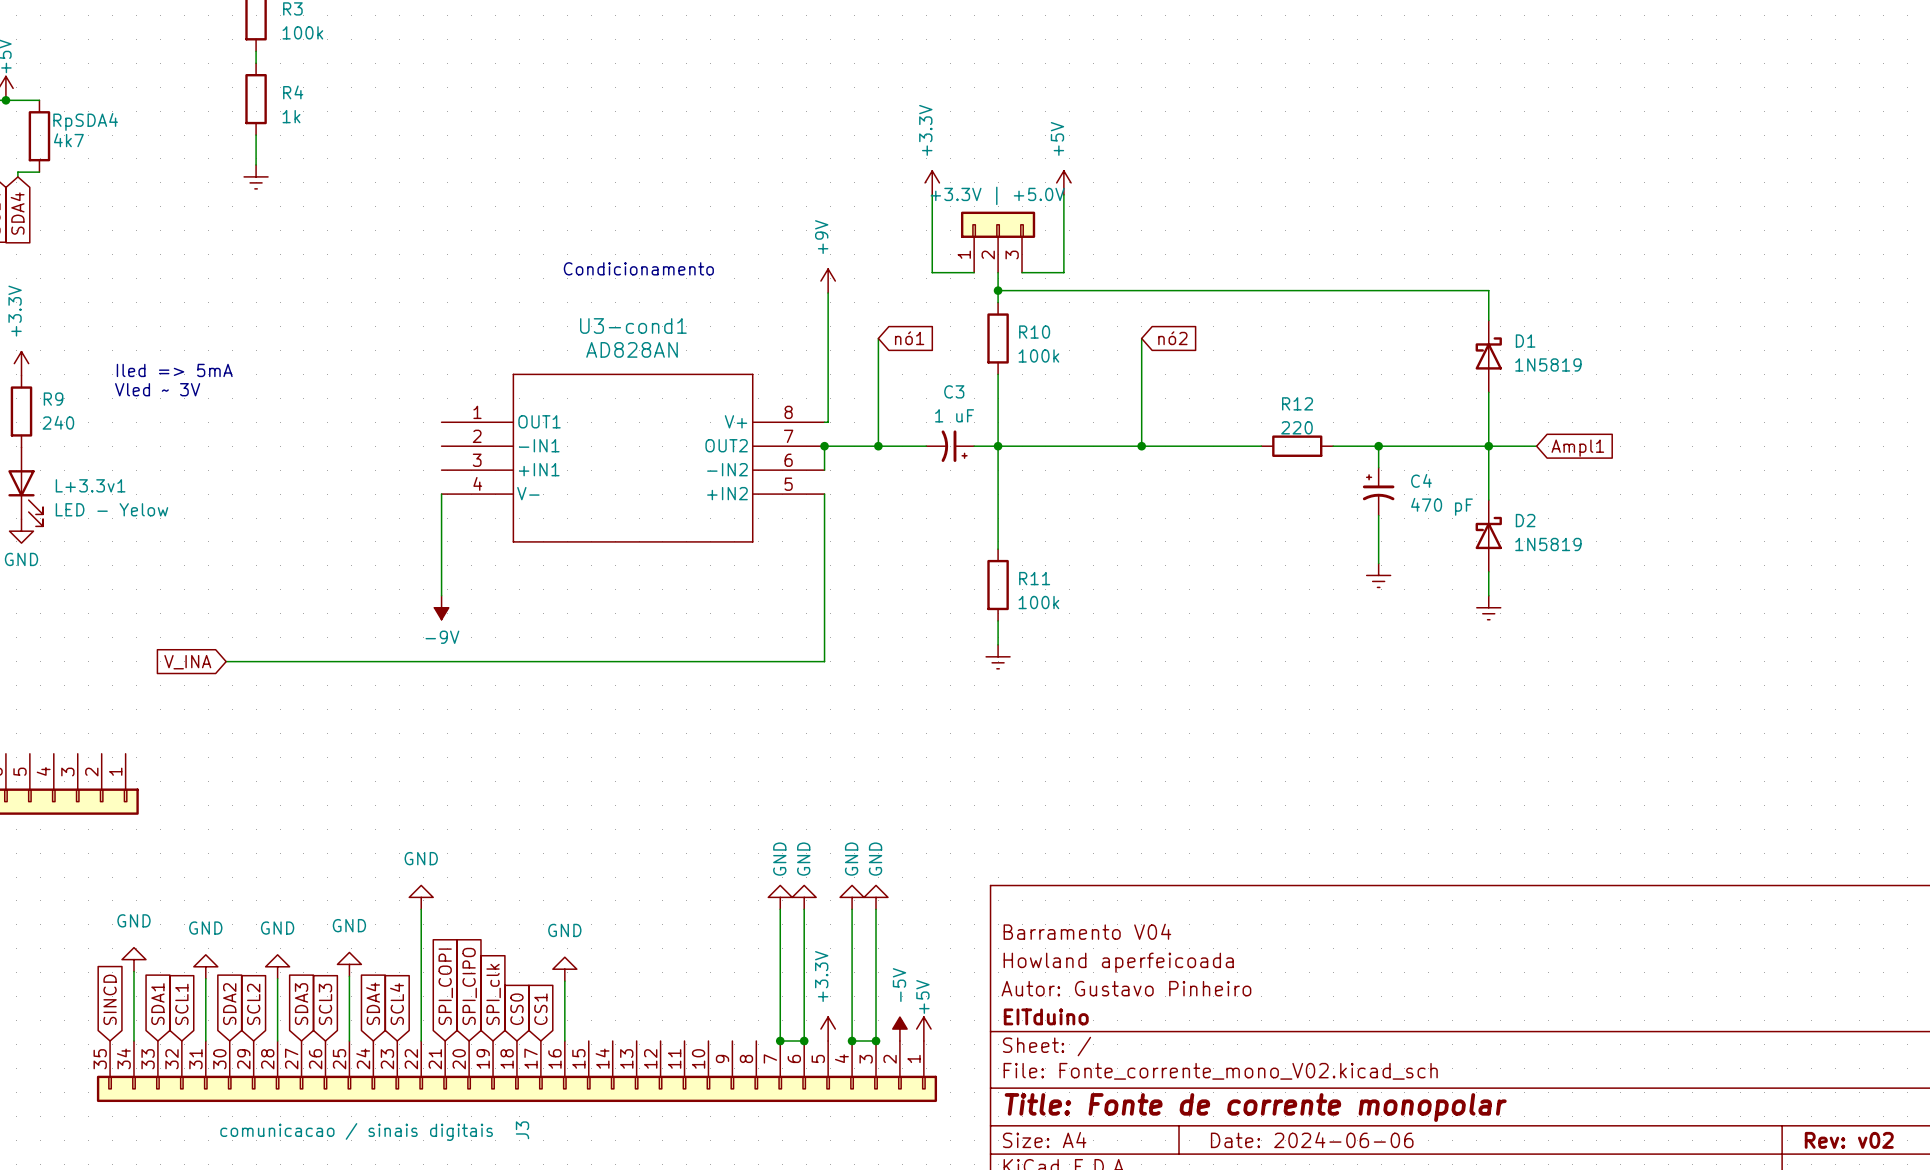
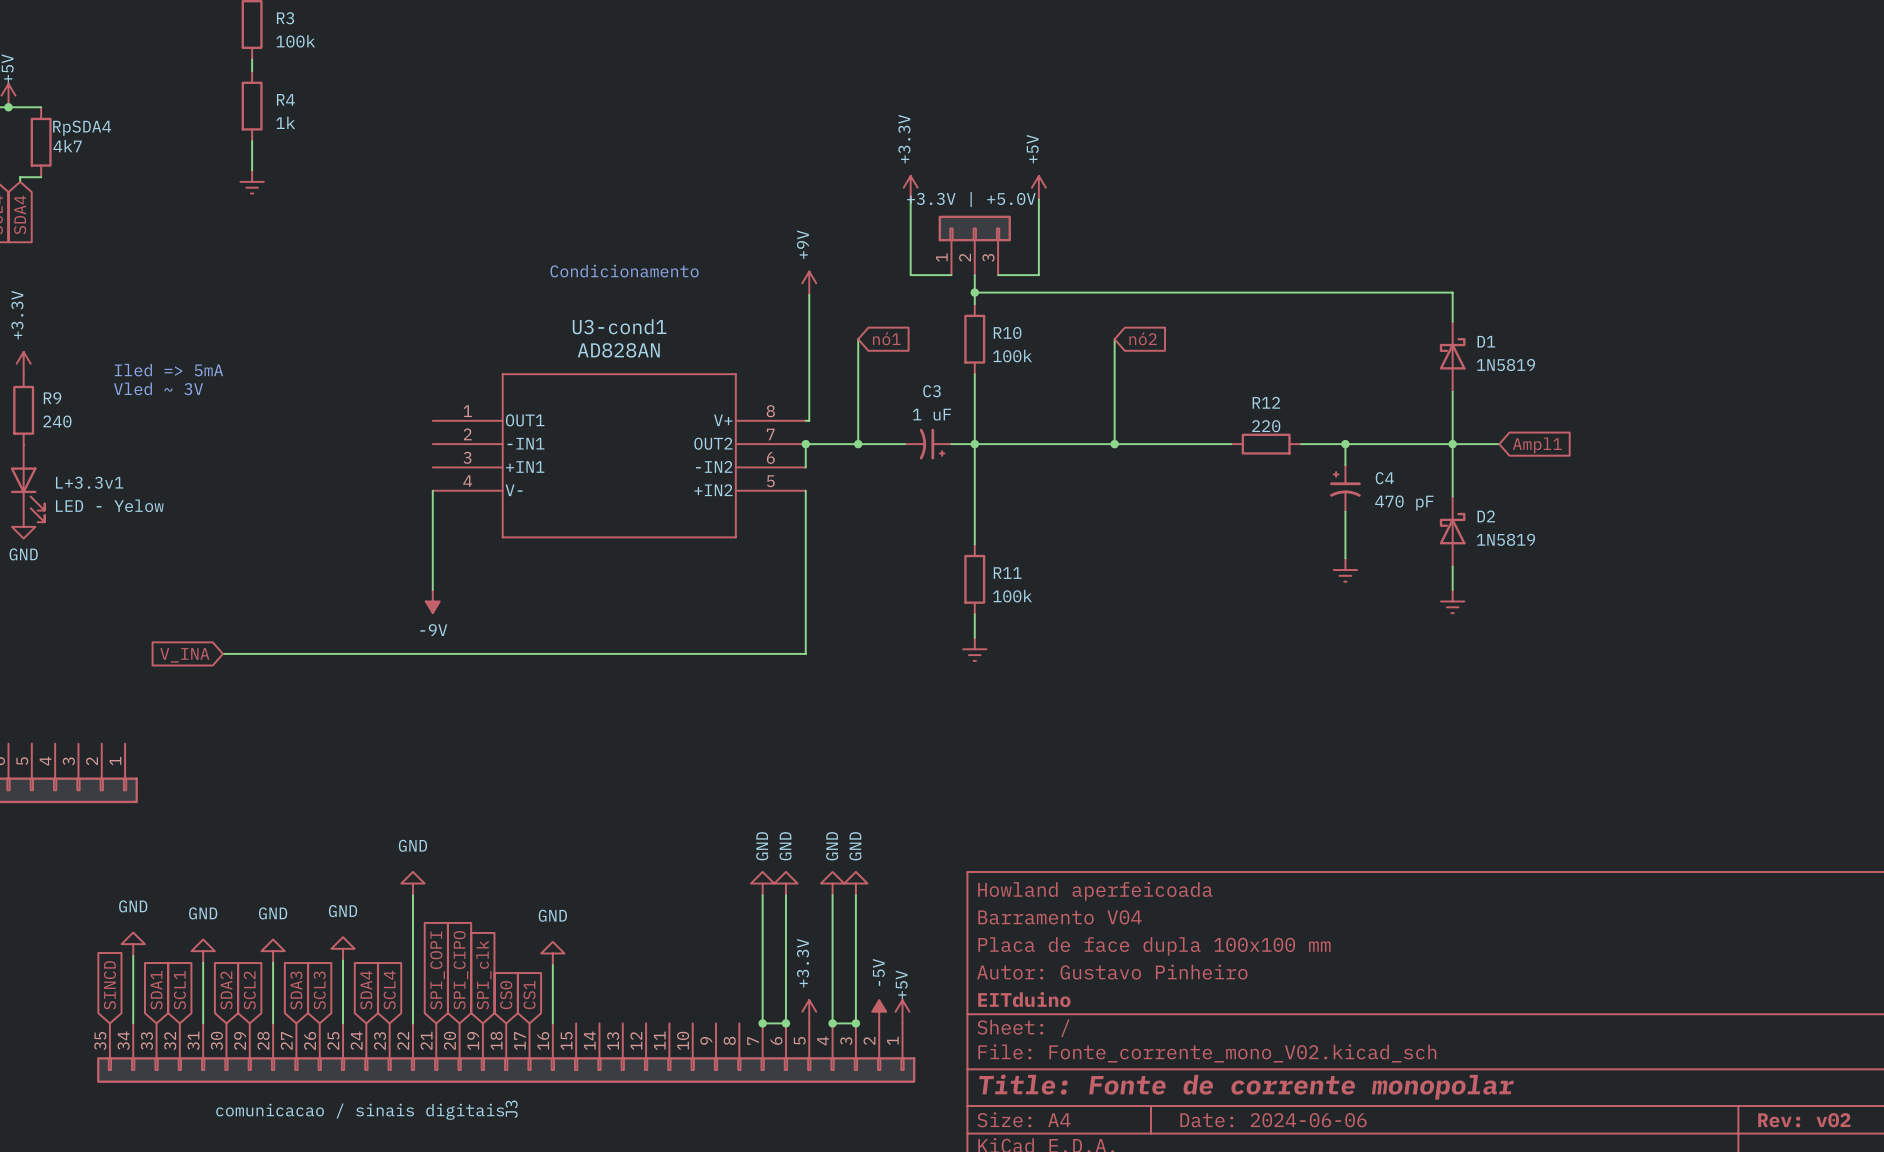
title block: none -> Howland aperfeicoada (1095, 891)
title block: Howland aperfeicoada (1118, 962) -> Placa de face dupla 100x100 mm (1154, 946)

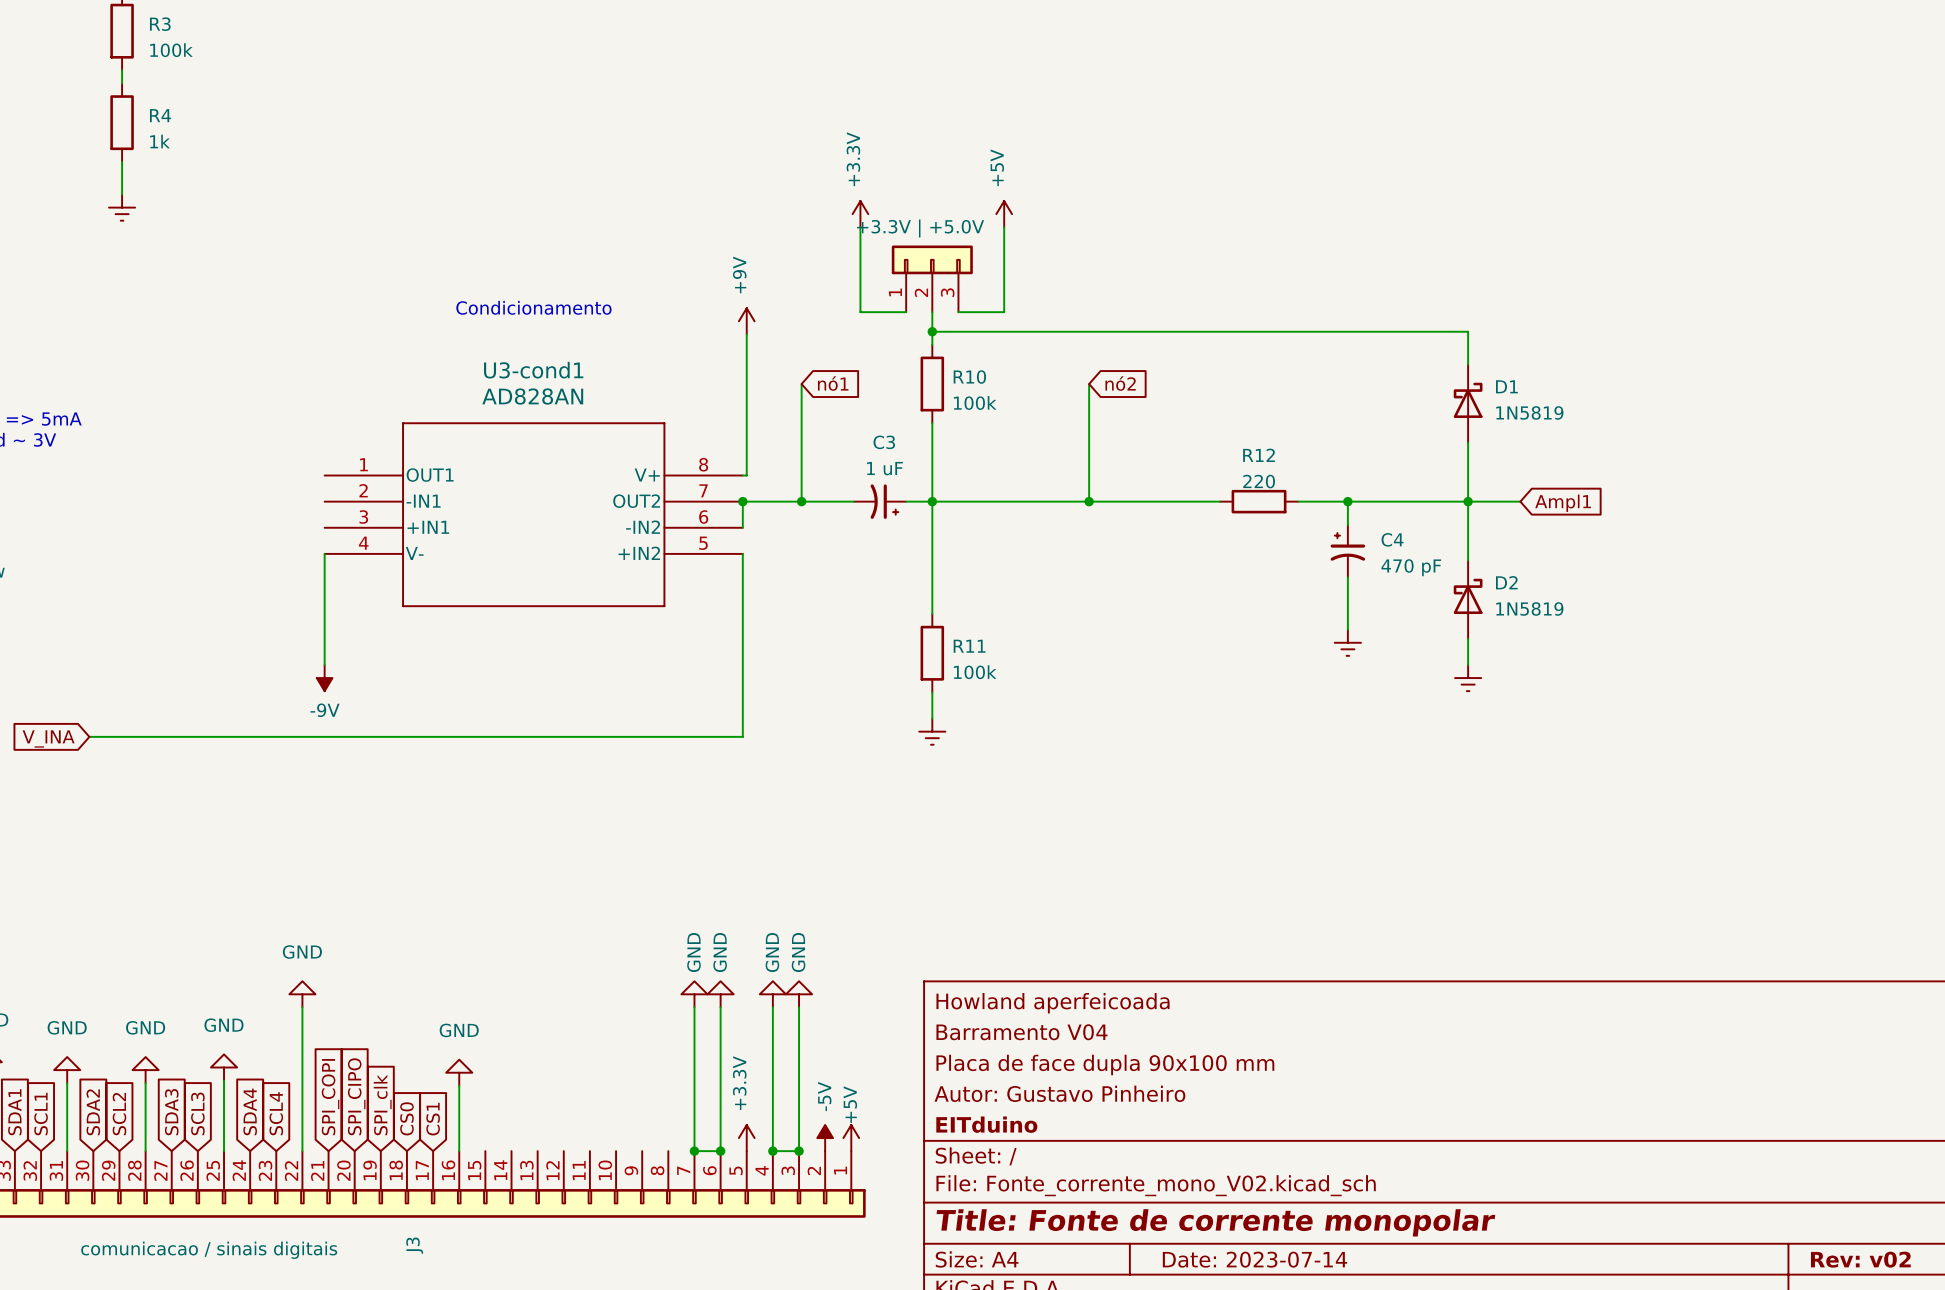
title block: Placa de face dupla 100x100 mm (1154, 946) -> Placa de face dupla 90x100 mm (1105, 1064)
title block: Date: 2024-06-06 (1273, 1120) -> Date: 2023-07-14 (1254, 1259)

